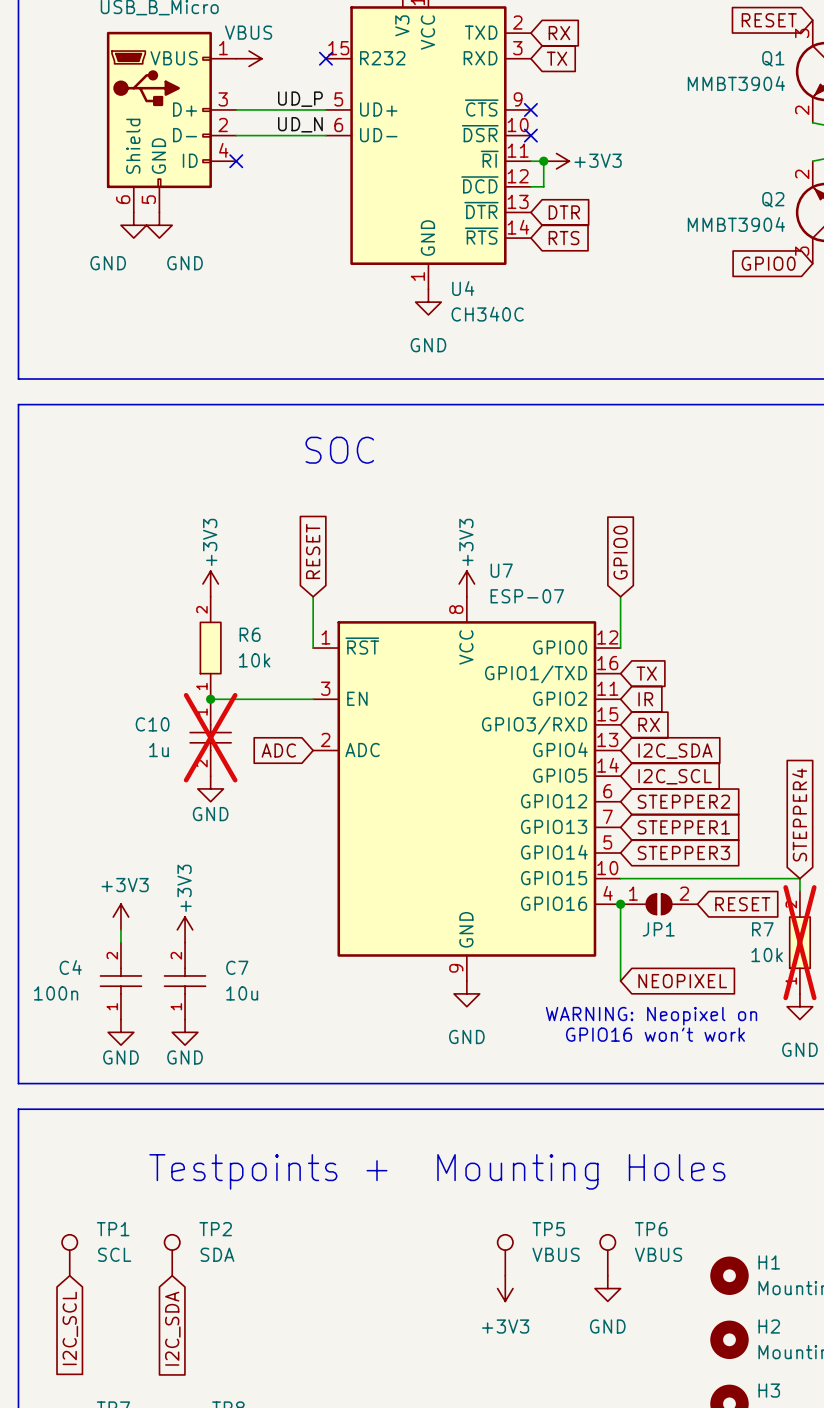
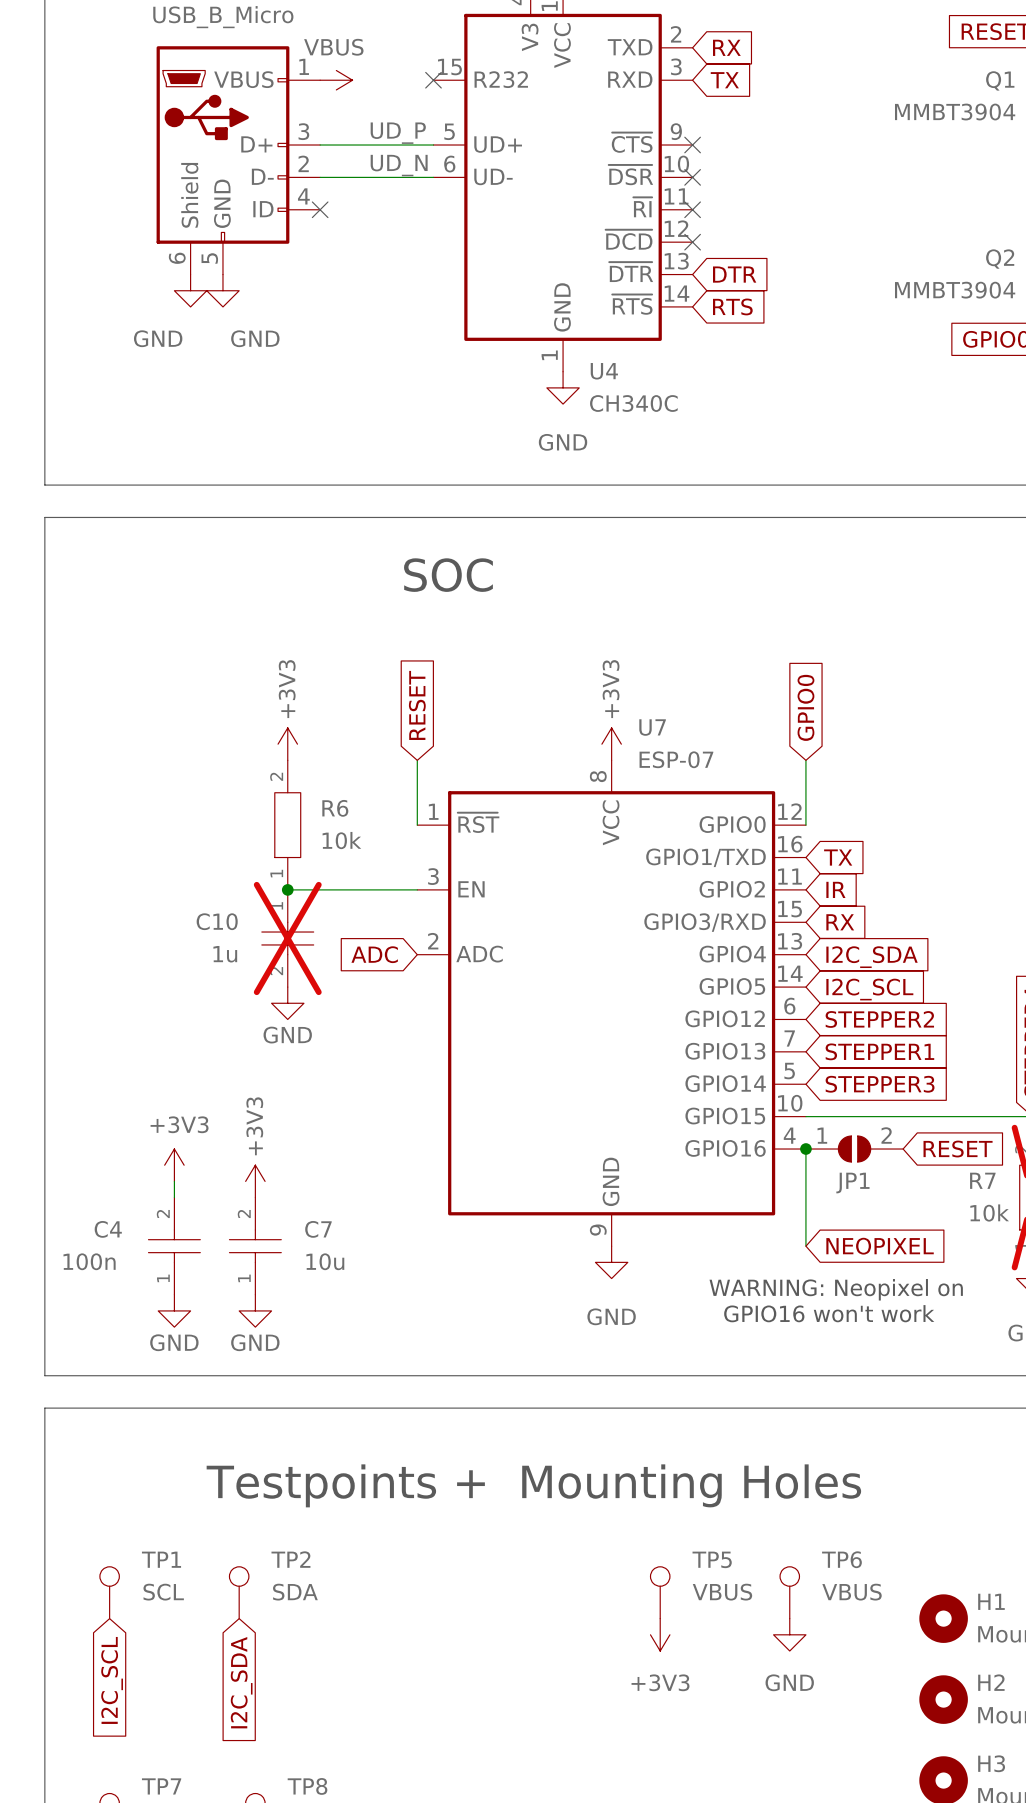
wire: (530, 161) (543, 161) (543, 186) (530, 186) -> none
no-connect mark: none -> (692, 209)
junction: (543, 161) -> none
power symbol: +3V3 (556, 161) -> none
no-connect mark: none -> (692, 242)

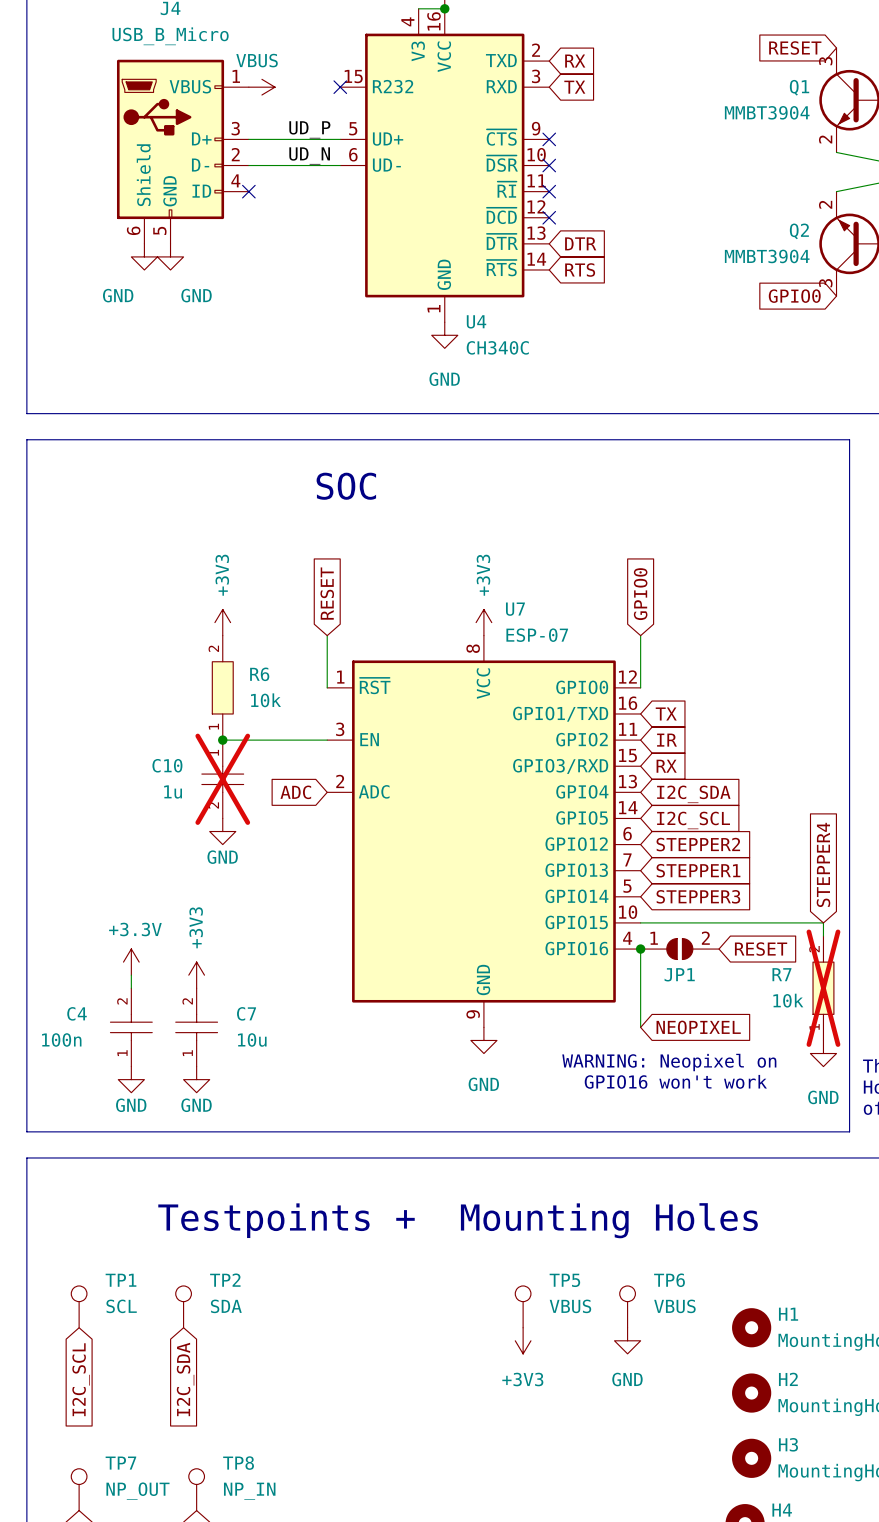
power symbol: +3V3 (174, 1165) -> +3.3V (131, 962)

